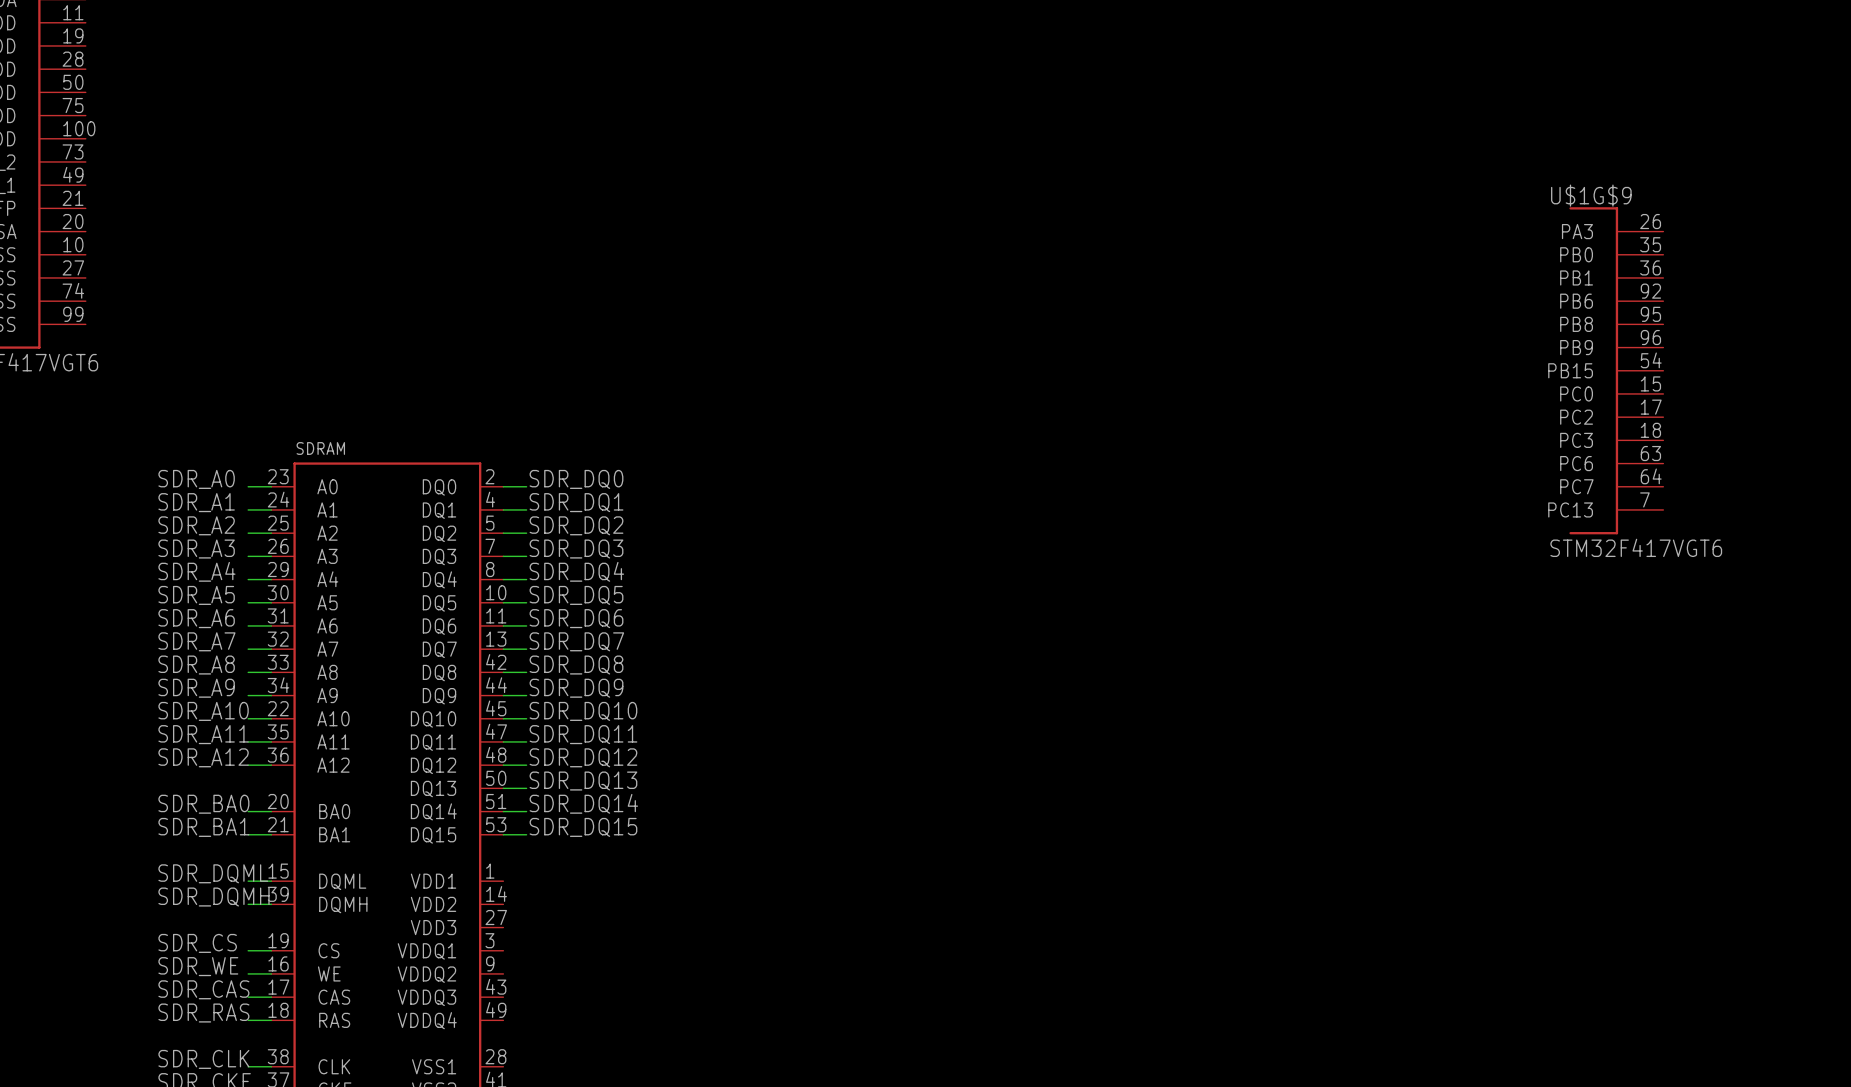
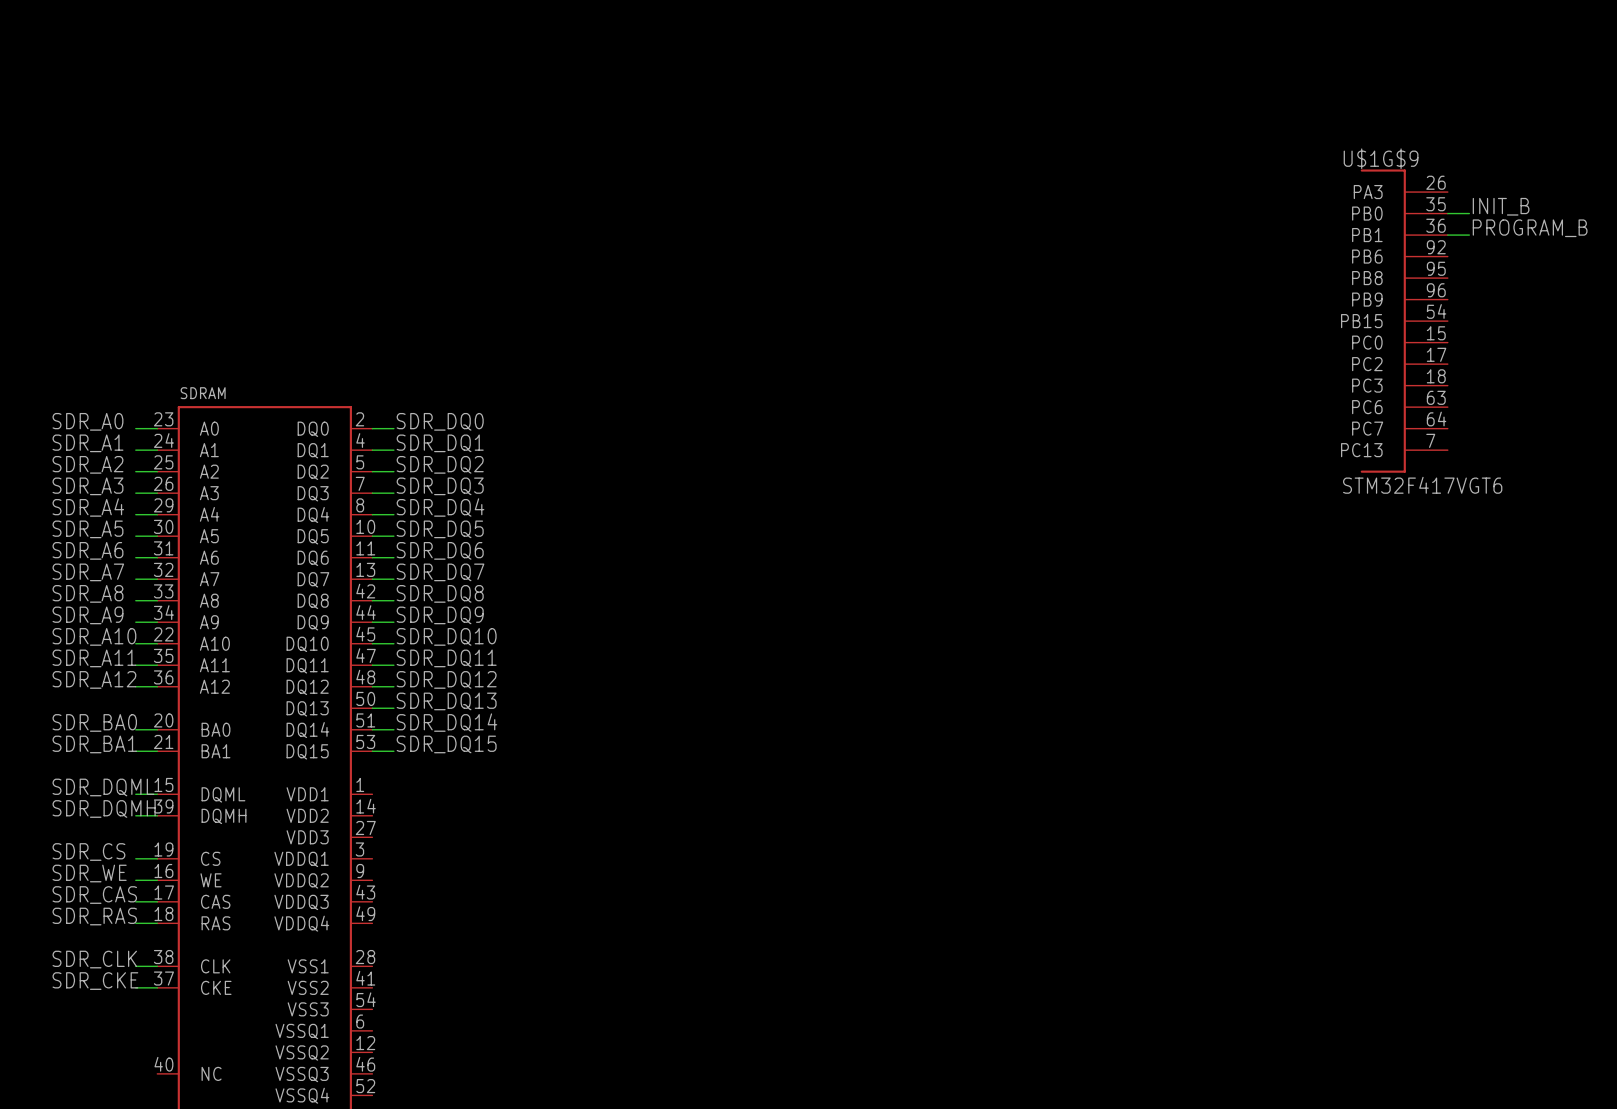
label: none -> INIT_B (1501, 206)
wire: none -> (1447, 213) (1469, 213)
label: none -> PROGRAM_B (1530, 228)
wire: none -> (1447, 235) (1469, 235)

